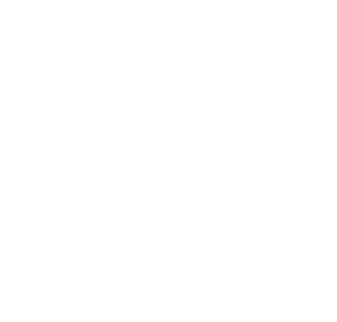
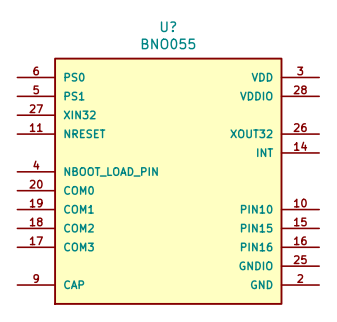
U?: none -> BNO055 (168, 181)

